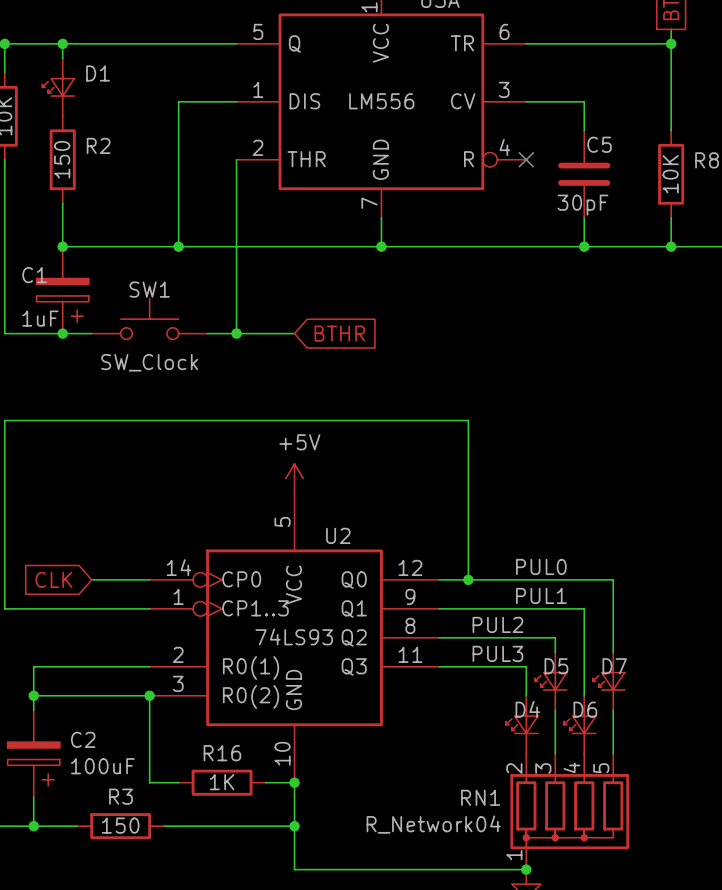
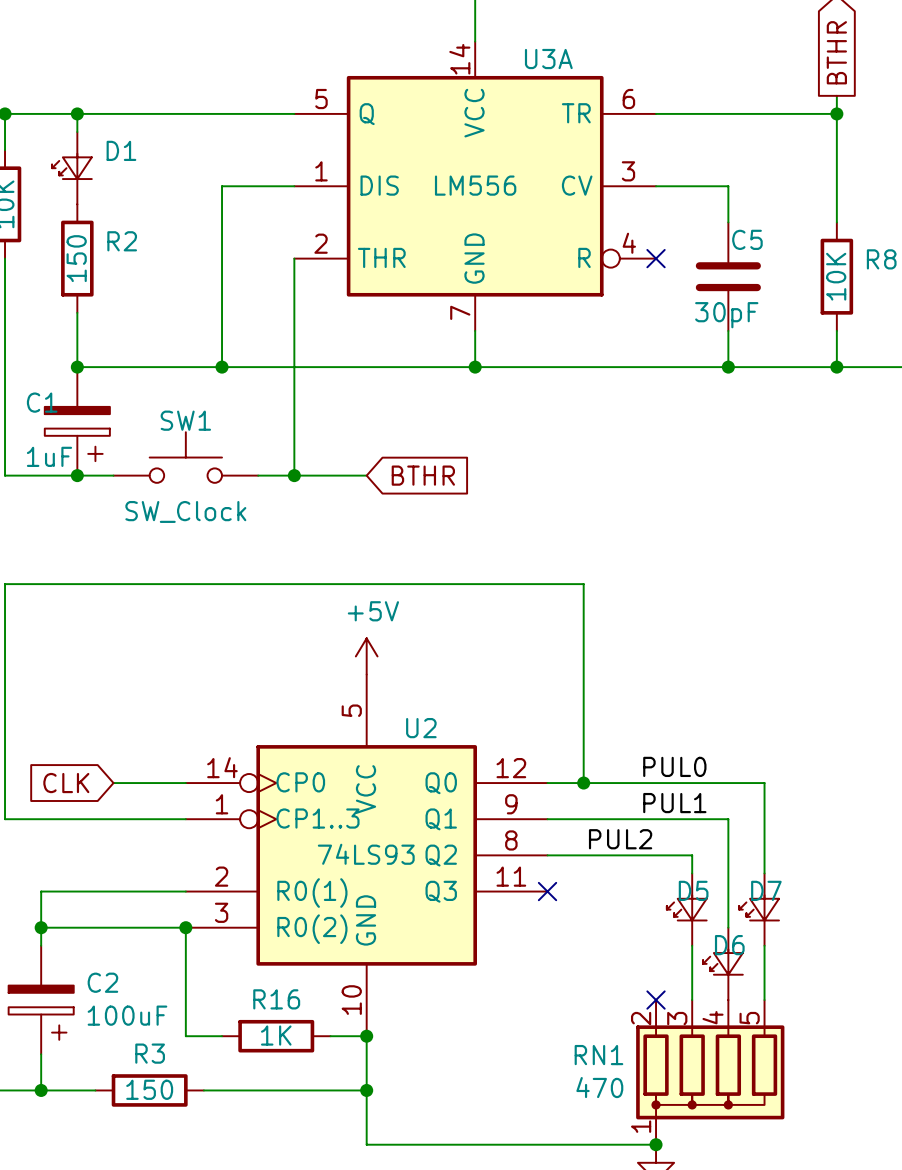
label: PUL3 (497, 653) -> none
wire: (439, 666) (526, 666) (526, 695) -> none
no-connect mark: none -> (547, 891)
D4: (521, 724) -> none
no-connect mark: none -> (656, 1000)
RN1 value: R_Network04 (433, 824) -> 470 (599, 1087)

